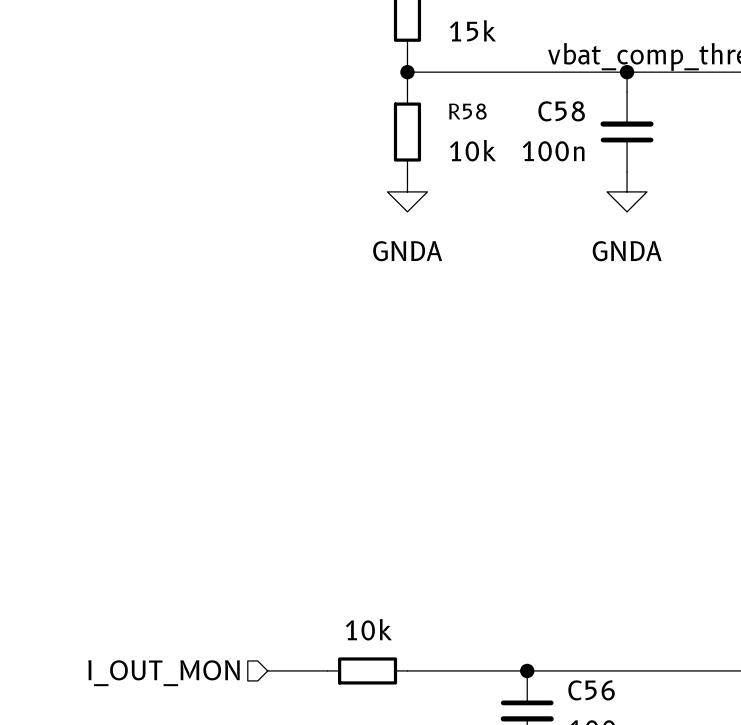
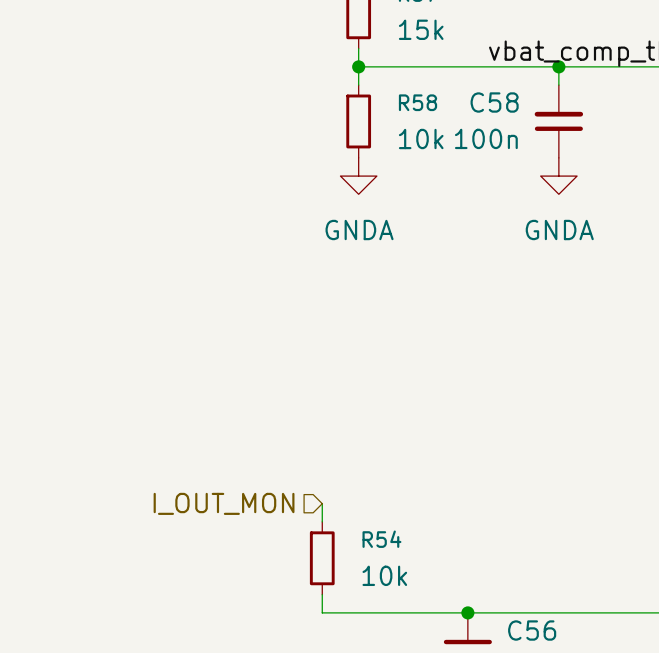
wire: none -> (322, 503) (322, 521)
R54: none -> 10k (322, 558)
wire: none -> (322, 594) (322, 612) (358, 612)
wire: (267, 670) (327, 670) -> none
part: 10k (367, 670) -> none
hierarchical label position: I_OUT_MON (163, 673) -> I_OUT_MON (224, 503)

